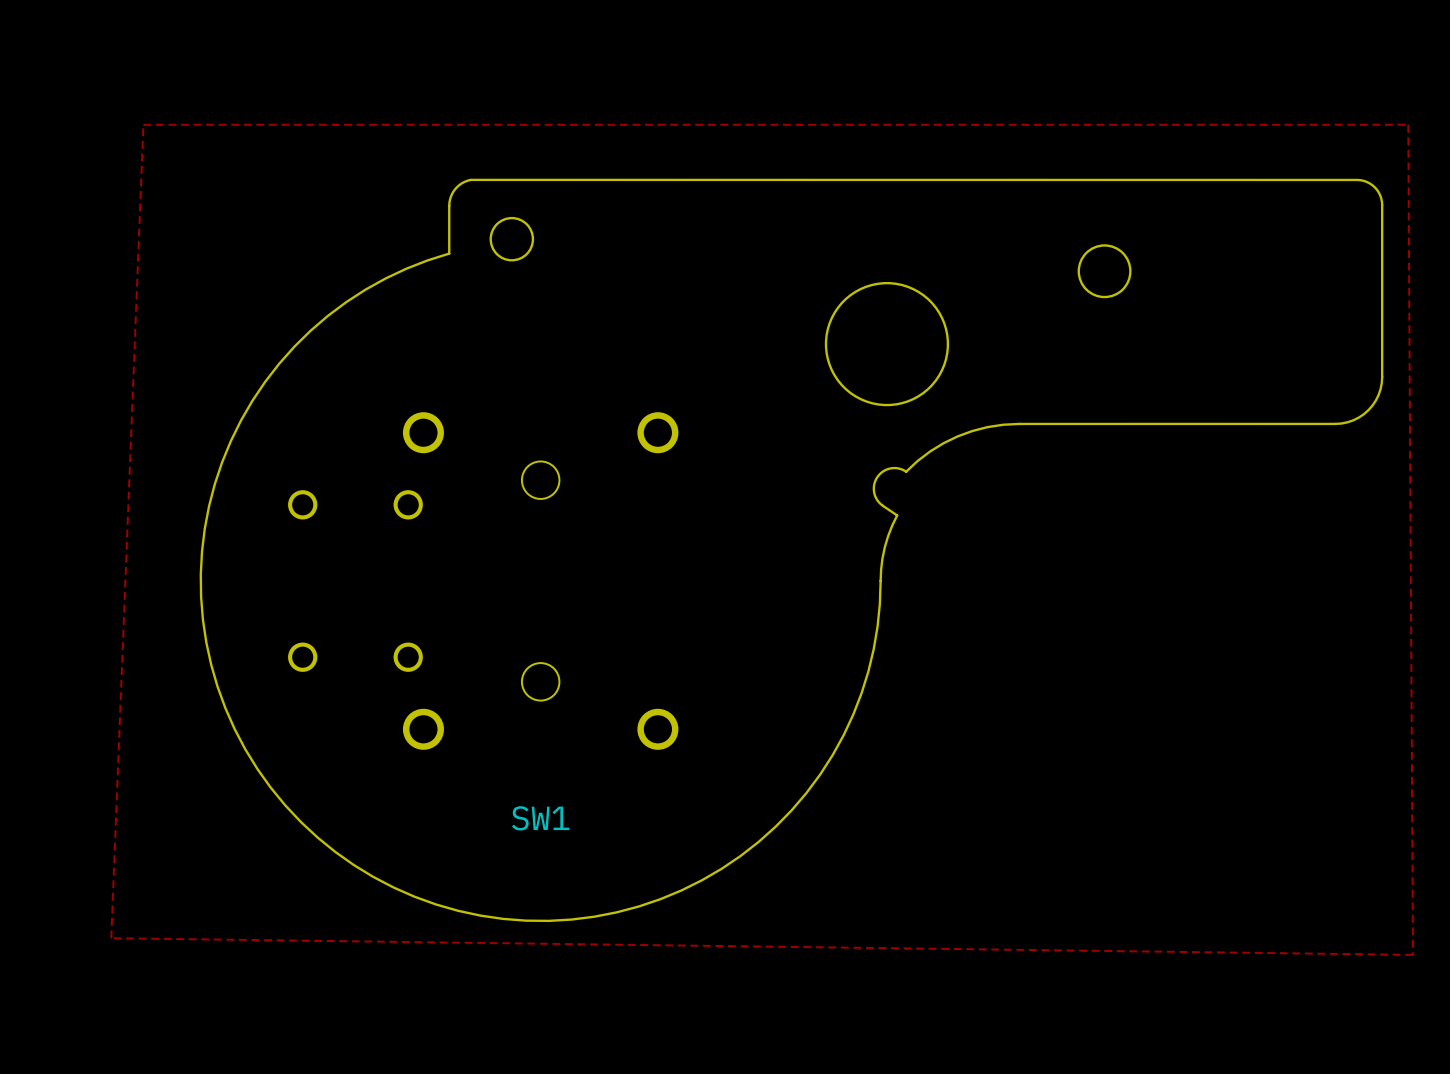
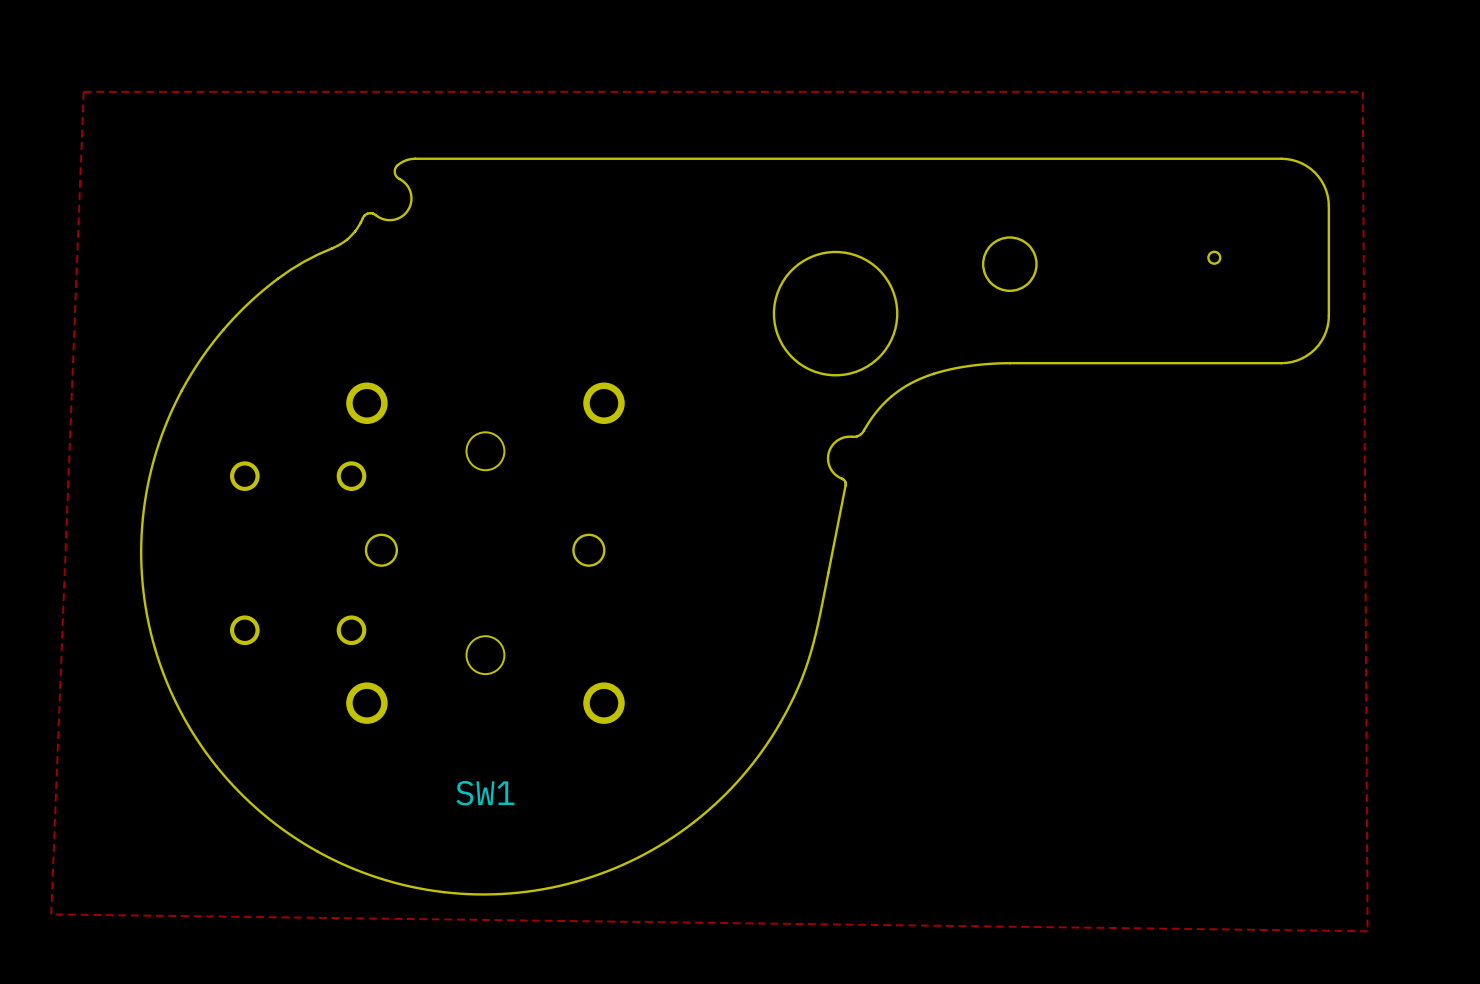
board edge: (470, 179) (1363, 180) (1377, 189) (1381, 201) (1382, 377) (1380, 389) (1375, 400) (1368, 410) (1353, 420) (1341, 423) (1003, 424) (987, 427) (957, 436) (930, 451) (906, 471) (894, 468) (884, 470) (875, 481) (874, 493) (880, 504) (897, 515) (888, 536) (882, 558) (877, 626) (868, 671) (853, 714) (843, 735) (820, 774) (791, 810) (758, 841) (721, 868) (681, 890) (638, 906) (594, 916) (548, 920) (503, 918) (458, 910) (436, 904) (393, 887) (353, 865) (335, 851) (300, 821) (270, 787) (257, 768) (234, 729) (217, 686) (211, 664) (202, 619) (200, 574) (204, 528) (214, 484) (230, 441) (240, 420) (265, 381) (294, 346) (327, 315) (346, 302) (385, 278) (406, 268) (449, 253) (449, 199) (457, 186) (470, 179) -> (415, 158) (402, 161) (395, 169) (396, 176) (406, 184) (411, 194) (410, 205) (404, 214) (397, 218) (388, 220) (372, 213) (365, 214) (355, 231) (346, 239) (290, 269) (259, 293) (229, 322) (203, 355) (177, 398) (158, 444) (145, 500) (141, 550) (142, 583) (147, 616) (163, 672) (188, 725) (221, 772) (262, 813) (310, 847) (362, 872) (418, 888) (460, 893) (501, 893) (551, 887) (591, 876) (630, 861) (666, 841) (700, 816) (731, 788) (757, 756) (780, 722) (799, 685) (811, 651) (845, 484) (844, 480) (835, 474) (830, 468) (828, 458) (829, 450) (839, 439) (861, 434) (882, 405) (905, 386) (924, 377) (945, 370) (993, 363) (1286, 362) (1302, 358) (1310, 352) (1321, 340) (1327, 326) (1327, 195) (1321, 180) (1314, 172) (1302, 163) (1291, 159) (415, 158)
round board edge: [489, 216, 535, 262] -> none
round board edge: [1077, 244, 1132, 299] -> none
round board edge: none -> [981, 236, 1038, 293]
round board edge: none -> [1207, 250, 1222, 265]
round board edge: none -> [364, 533, 399, 567]
round board edge: none -> [572, 533, 606, 567]

